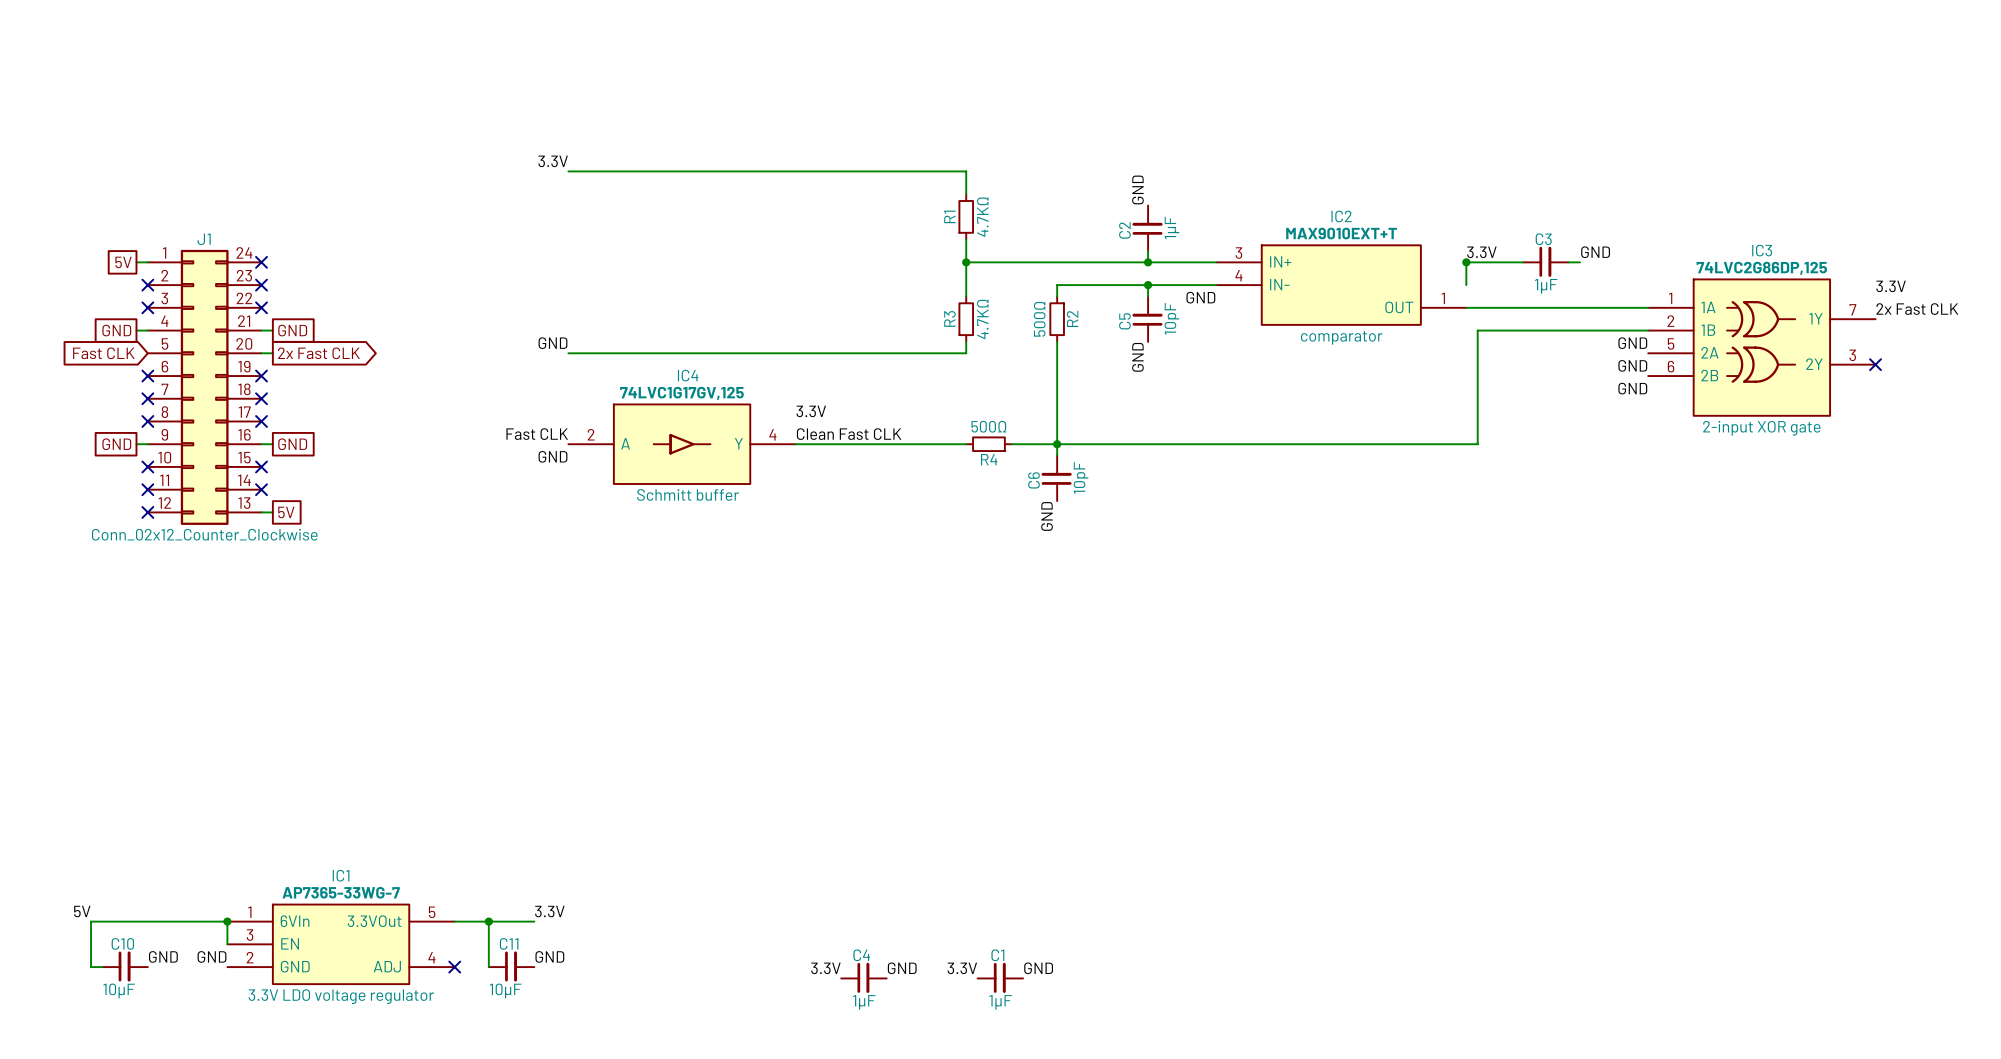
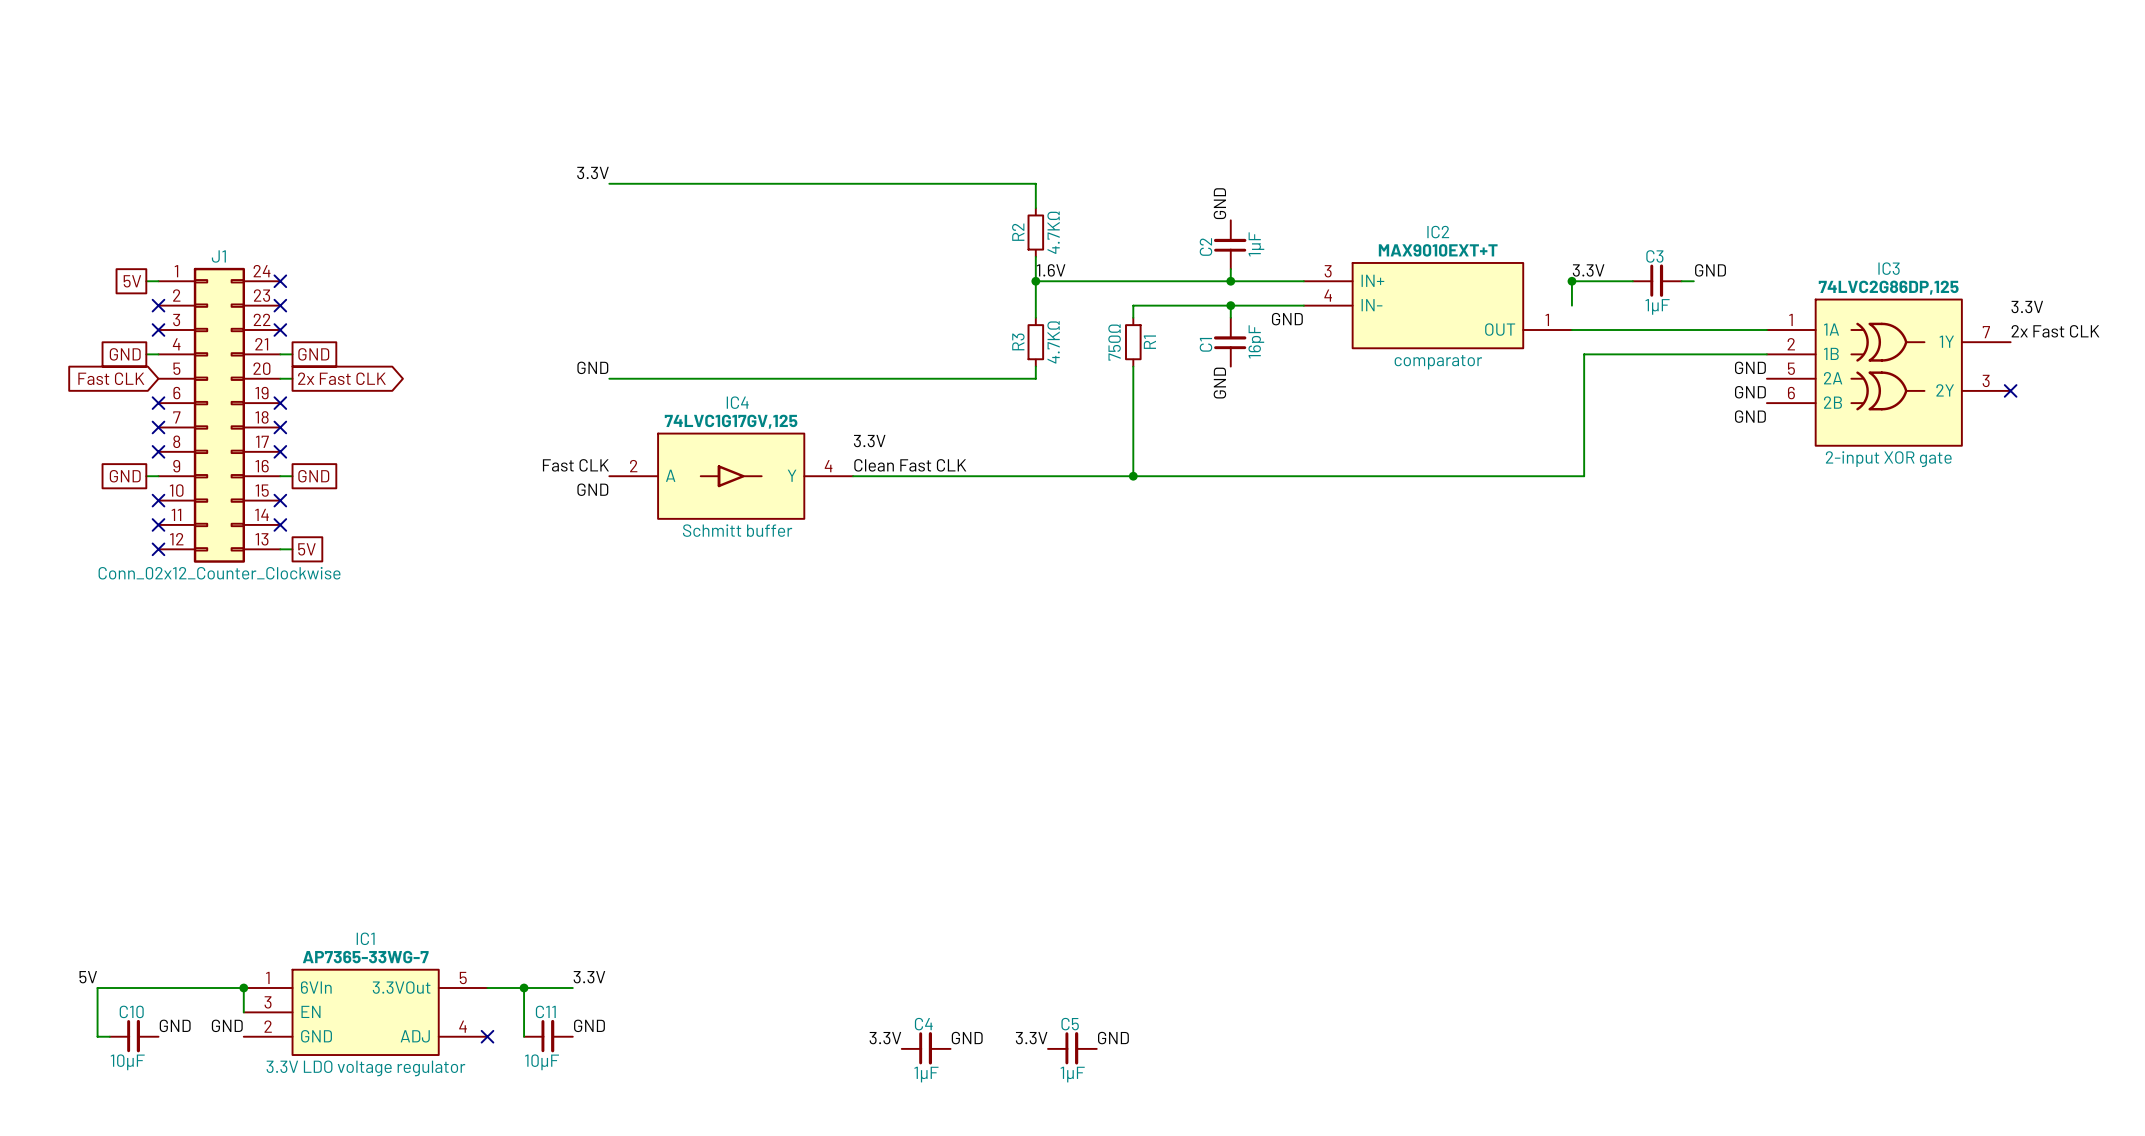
R1 name: R1 (949, 216) -> R2 (1018, 232)
label: none -> 1.6V (1051, 270)
R2 name: R2 (1072, 318) -> R1 (1149, 342)
C5 value: 10pF (1171, 318) -> 16pF (1256, 341)
R2 value: 500Ω (1039, 319) -> 750Ω (1114, 342)
C5 name: C5 (1124, 321) -> C1 (1205, 344)
wire: none -> (1035, 476) (1084, 476)
R4: 500Ω (988, 444) -> none
wire: (1057, 444) (1057, 455) -> none
C6: 10pF (1056, 478) -> none
label: GND (1047, 516) -> none
C1 name: C1 (997, 955) -> C5 (1070, 1024)

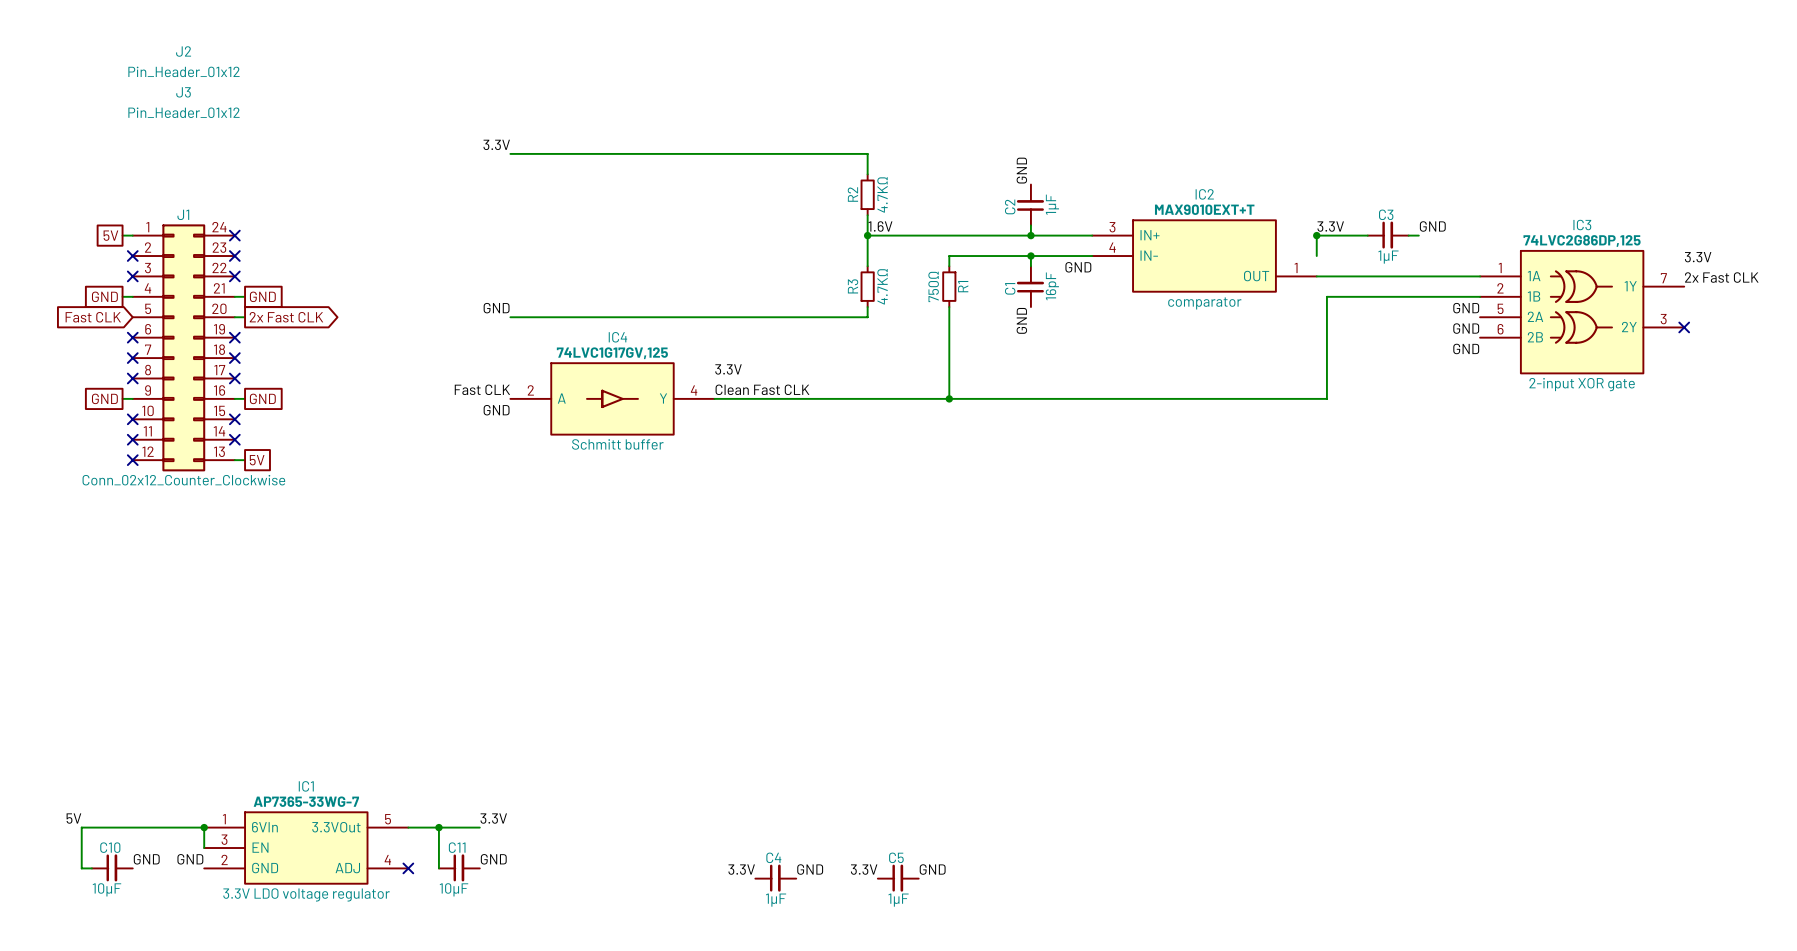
J2: none -> Pin_Header_01x12 (184, 61)
J3: none -> Pin_Header_01x12 (184, 102)

